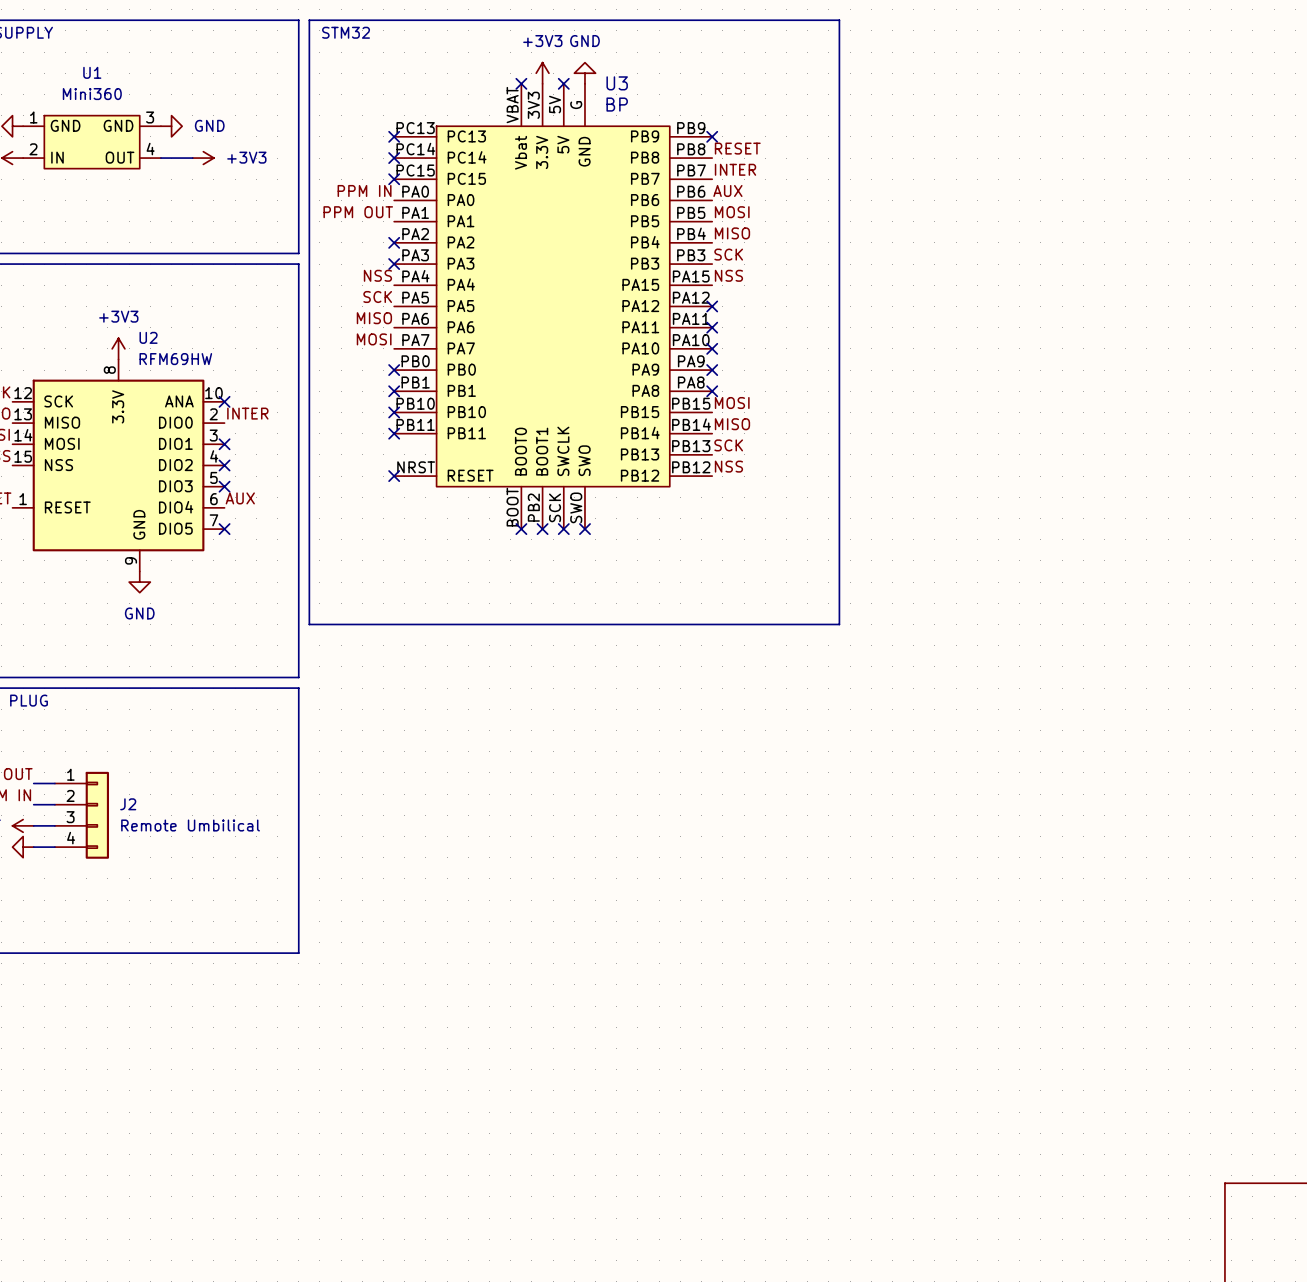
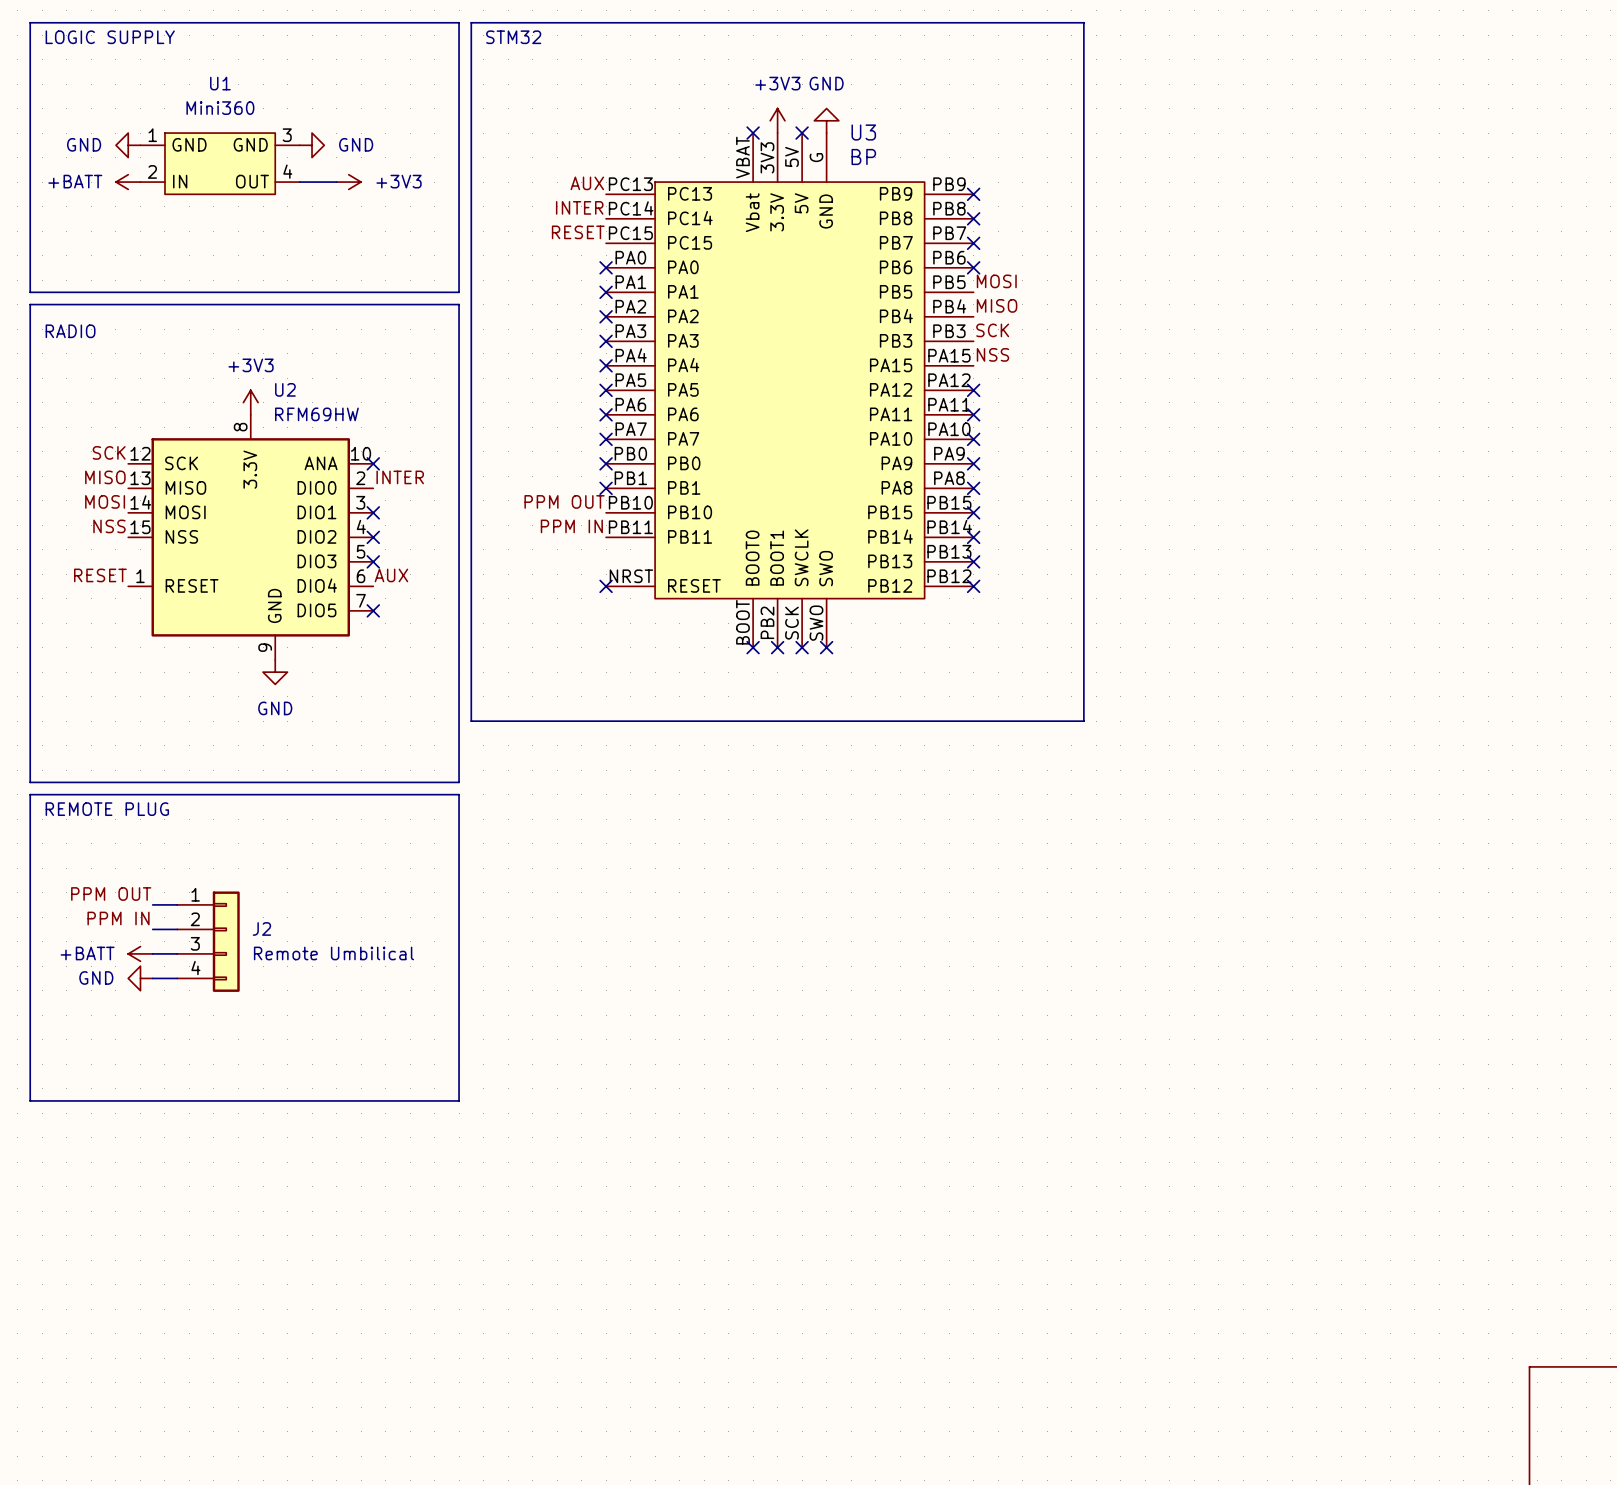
power symbol position: +3V3 (542, 73) -> +3V3 (777, 120)
power symbol position: GND (584, 73) -> GND (826, 120)
no-connect mark: (521, 83) -> none
no-connect mark: (563, 83) -> none
no-connect mark: none -> (753, 133)
no-connect mark: none -> (802, 133)
no-connect mark: (394, 136) -> none
no-connect mark: (712, 136) -> none
label: RESET (737, 148) -> none
no-connect mark: (394, 158) -> none
label: none -> AUX (587, 183)
no-connect mark: none -> (973, 194)
label: INTER (735, 169) -> none
no-connect mark: (394, 179) -> none
label: none -> INTER (579, 207)
no-connect mark: none -> (973, 218)
label: PPM IN (364, 190) -> none
label: AUX (727, 190) -> none
label: none -> RESET (578, 232)
no-connect mark: none -> (973, 243)
label: PPM OUT (358, 212) -> none
label position: MOSI (732, 212) -> MOSI (996, 281)
no-connect mark: none -> (606, 267)
no-connect mark: none -> (973, 267)
label position: MISO (732, 233) -> MISO (997, 305)
no-connect mark: (394, 242) -> none
no-connect mark: none -> (606, 292)
label position: SCK (728, 254) -> SCK (992, 330)
no-connect mark: (394, 264) -> none
no-connect mark: none -> (606, 316)
label: NSS (377, 275) -> none
label position: NSS (728, 275) -> NSS (992, 354)
no-connect mark: none -> (606, 341)
label: SCK (377, 297) -> none
U3 position: (553, 306) -> (789, 390)
no-connect mark: (712, 306) -> none
no-connect mark: none -> (606, 365)
label: MISO (374, 318) -> none
no-connect mark: (712, 327) -> none
no-connect mark: none -> (606, 390)
no-connect mark: none -> (973, 390)
label: MOSI (374, 339) -> none
no-connect mark: (712, 348) -> none
no-connect mark: none -> (606, 414)
no-connect mark: none -> (973, 414)
no-connect mark: (394, 370) -> none
no-connect mark: (712, 370) -> none
no-connect mark: none -> (606, 439)
no-connect mark: none -> (973, 439)
no-connect mark: (394, 391) -> none
no-connect mark: (712, 391) -> none
no-connect mark: none -> (606, 463)
no-connect mark: none -> (973, 463)
label: MOSI (732, 403) -> none
no-connect mark: (394, 412) -> none
no-connect mark: none -> (606, 488)
no-connect mark: none -> (973, 488)
label: MISO (732, 424) -> none
no-connect mark: (394, 433) -> none
label: none -> PPM OUT (564, 501)
no-connect mark: none -> (973, 512)
label: SCK (728, 445) -> none
label: none -> PPM IN (571, 526)
no-connect mark: none -> (973, 537)
label: NSS (728, 466) -> none
no-connect mark: (394, 476) -> none
no-connect mark: none -> (973, 561)
no-connect mark: none -> (606, 586)
no-connect mark: none -> (973, 586)
no-connect mark: (521, 529) -> none
no-connect mark: (542, 529) -> none
no-connect mark: (563, 529) -> none
no-connect mark: (584, 529) -> none
no-connect mark: none -> (753, 647)
no-connect mark: none -> (777, 647)
no-connect mark: none -> (802, 647)
no-connect mark: none -> (826, 647)

